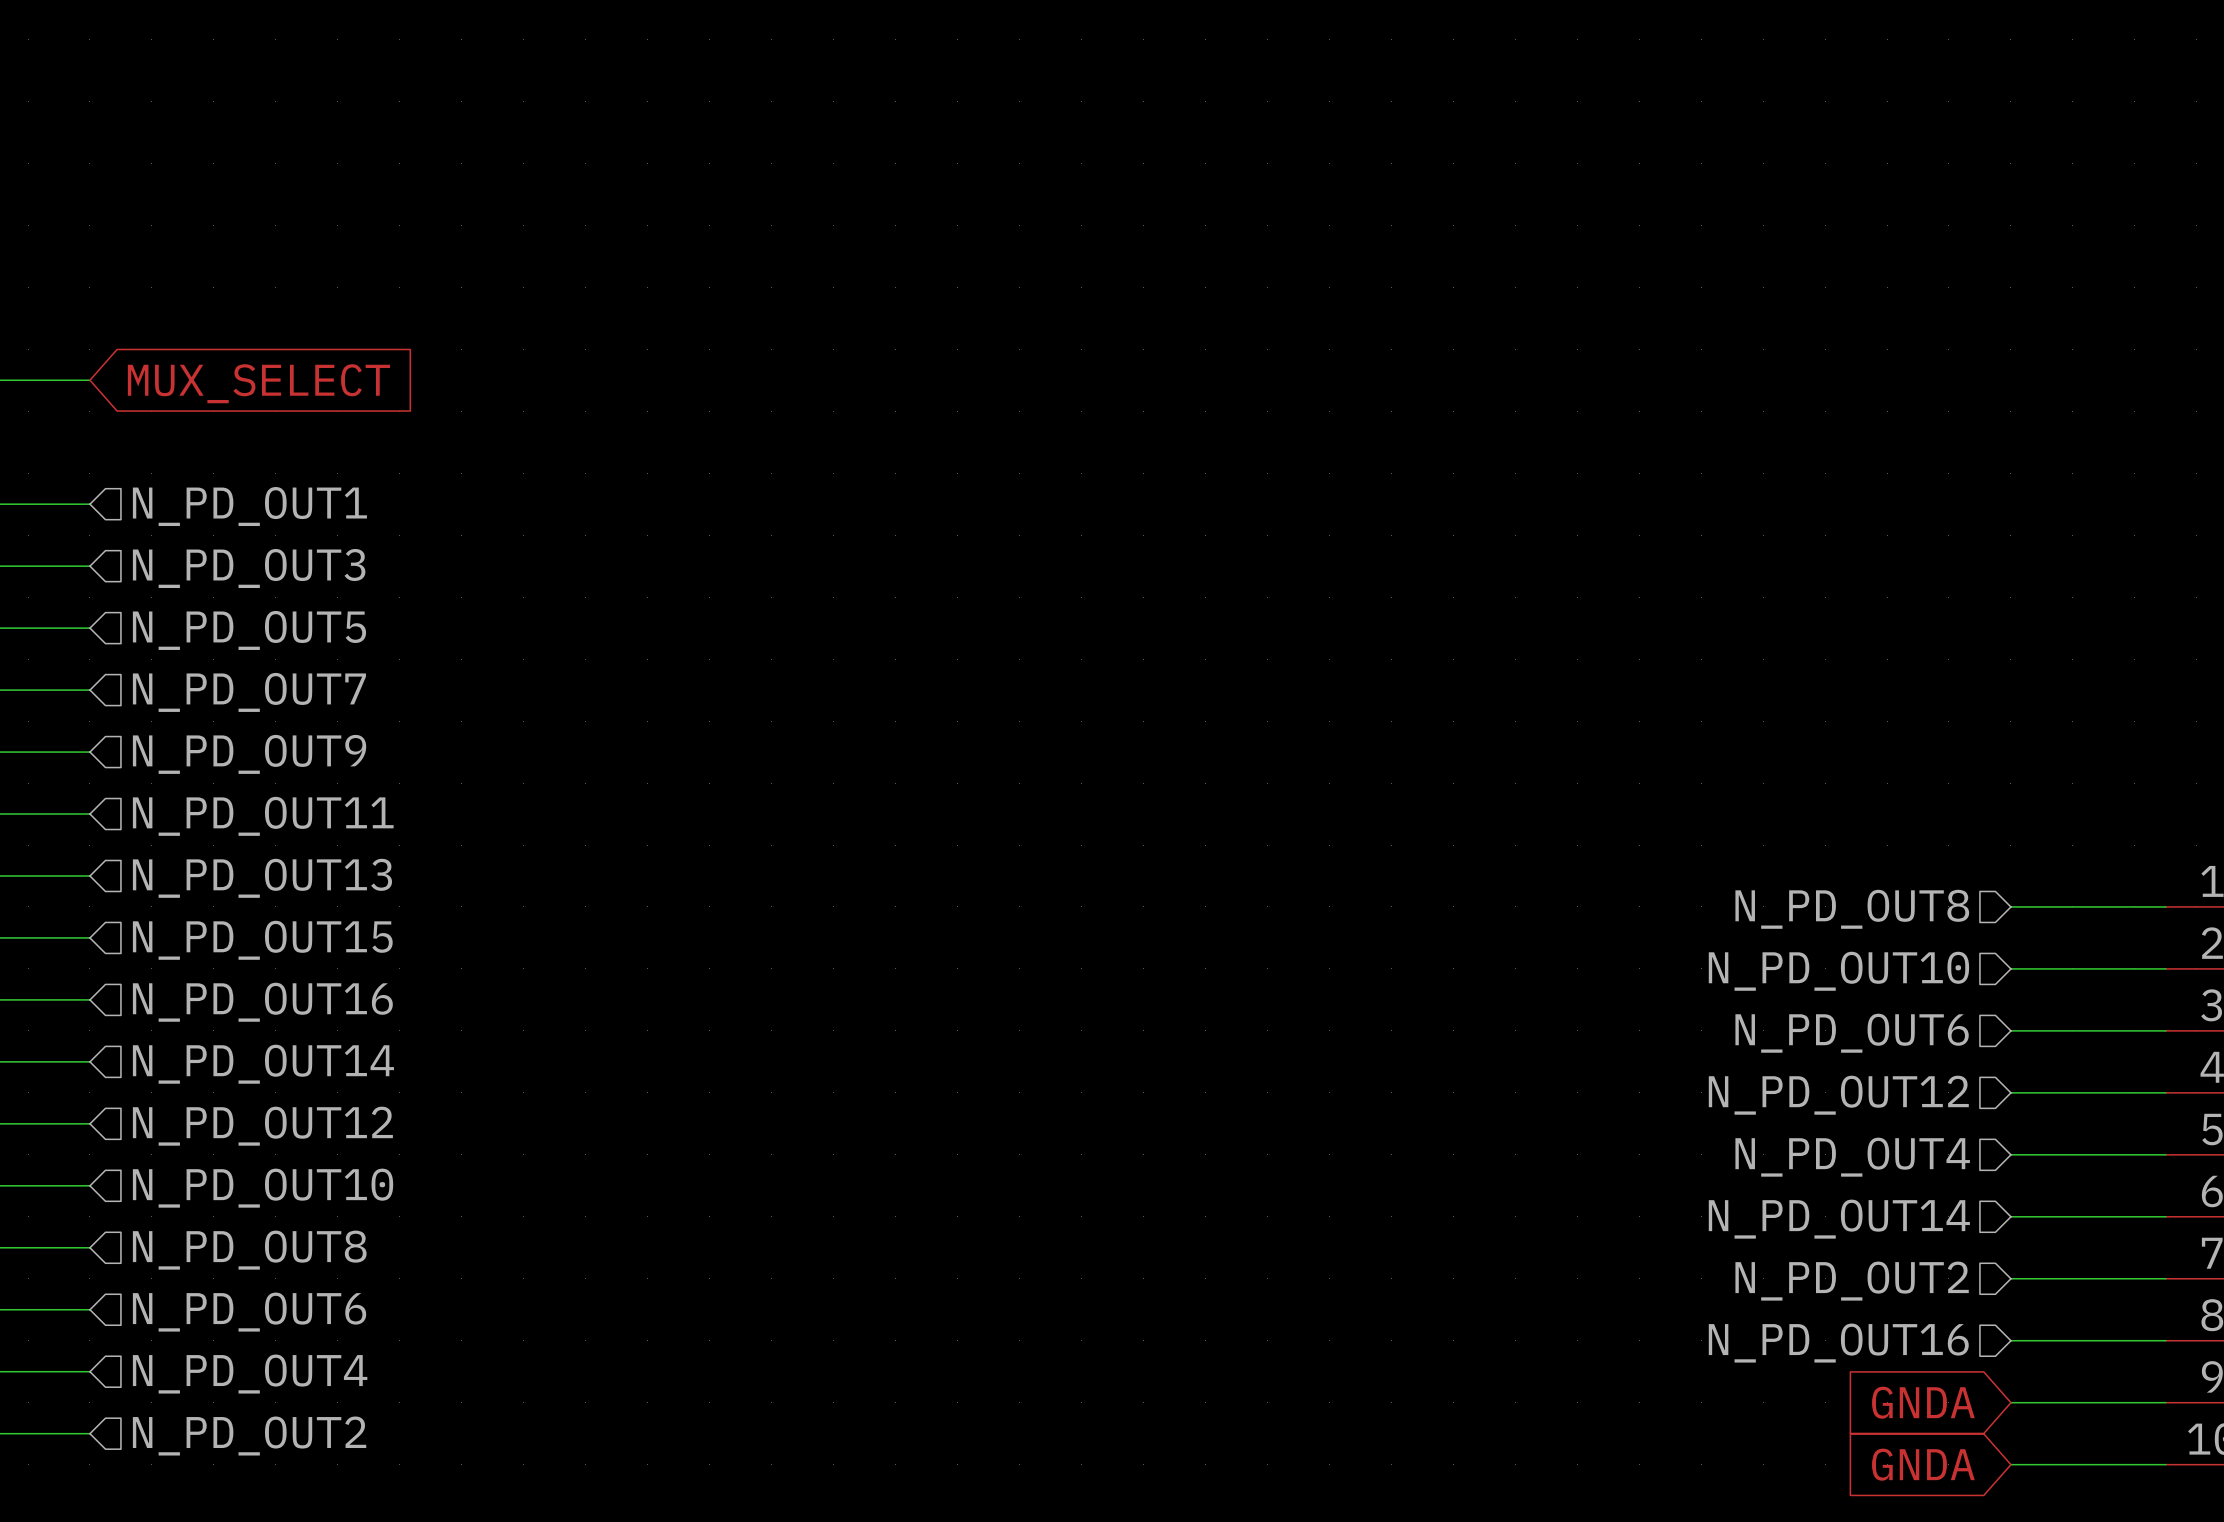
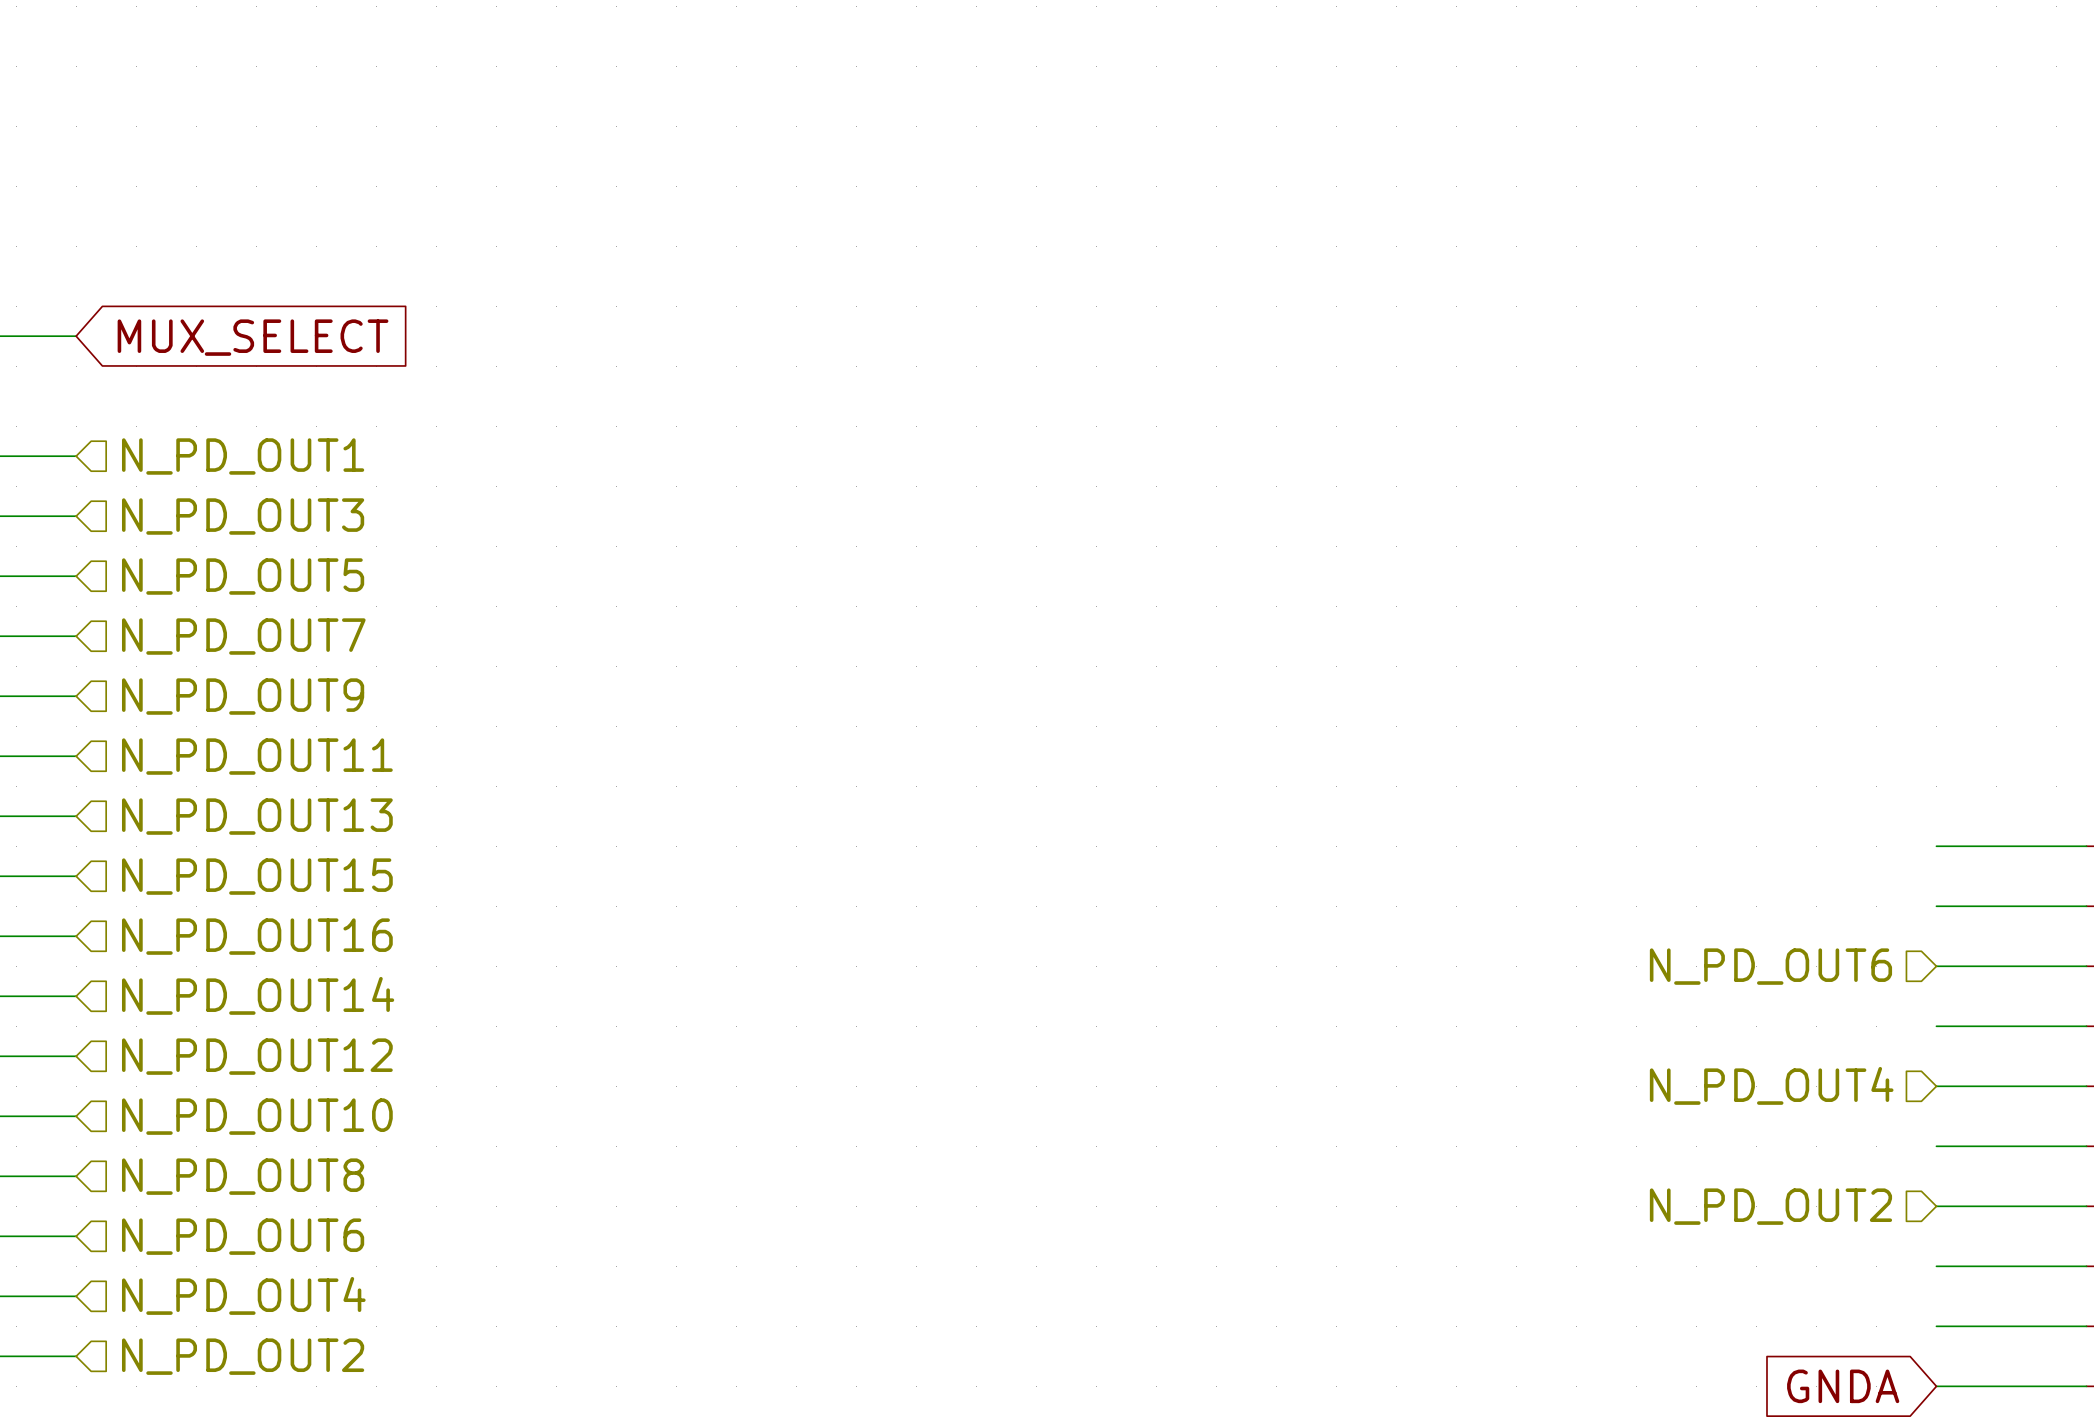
hierarchical label: N_PD_OUT8 (1852, 909) -> none
hierarchical label: N_PD_OUT10 (1838, 971) -> none
hierarchical label: N_PD_OUT12 (1838, 1095) -> none
hierarchical label: N_PD_OUT14 (1839, 1219) -> none
hierarchical label: N_PD_OUT16 (1838, 1343) -> none
global label: GNDA (1923, 1402) -> none

